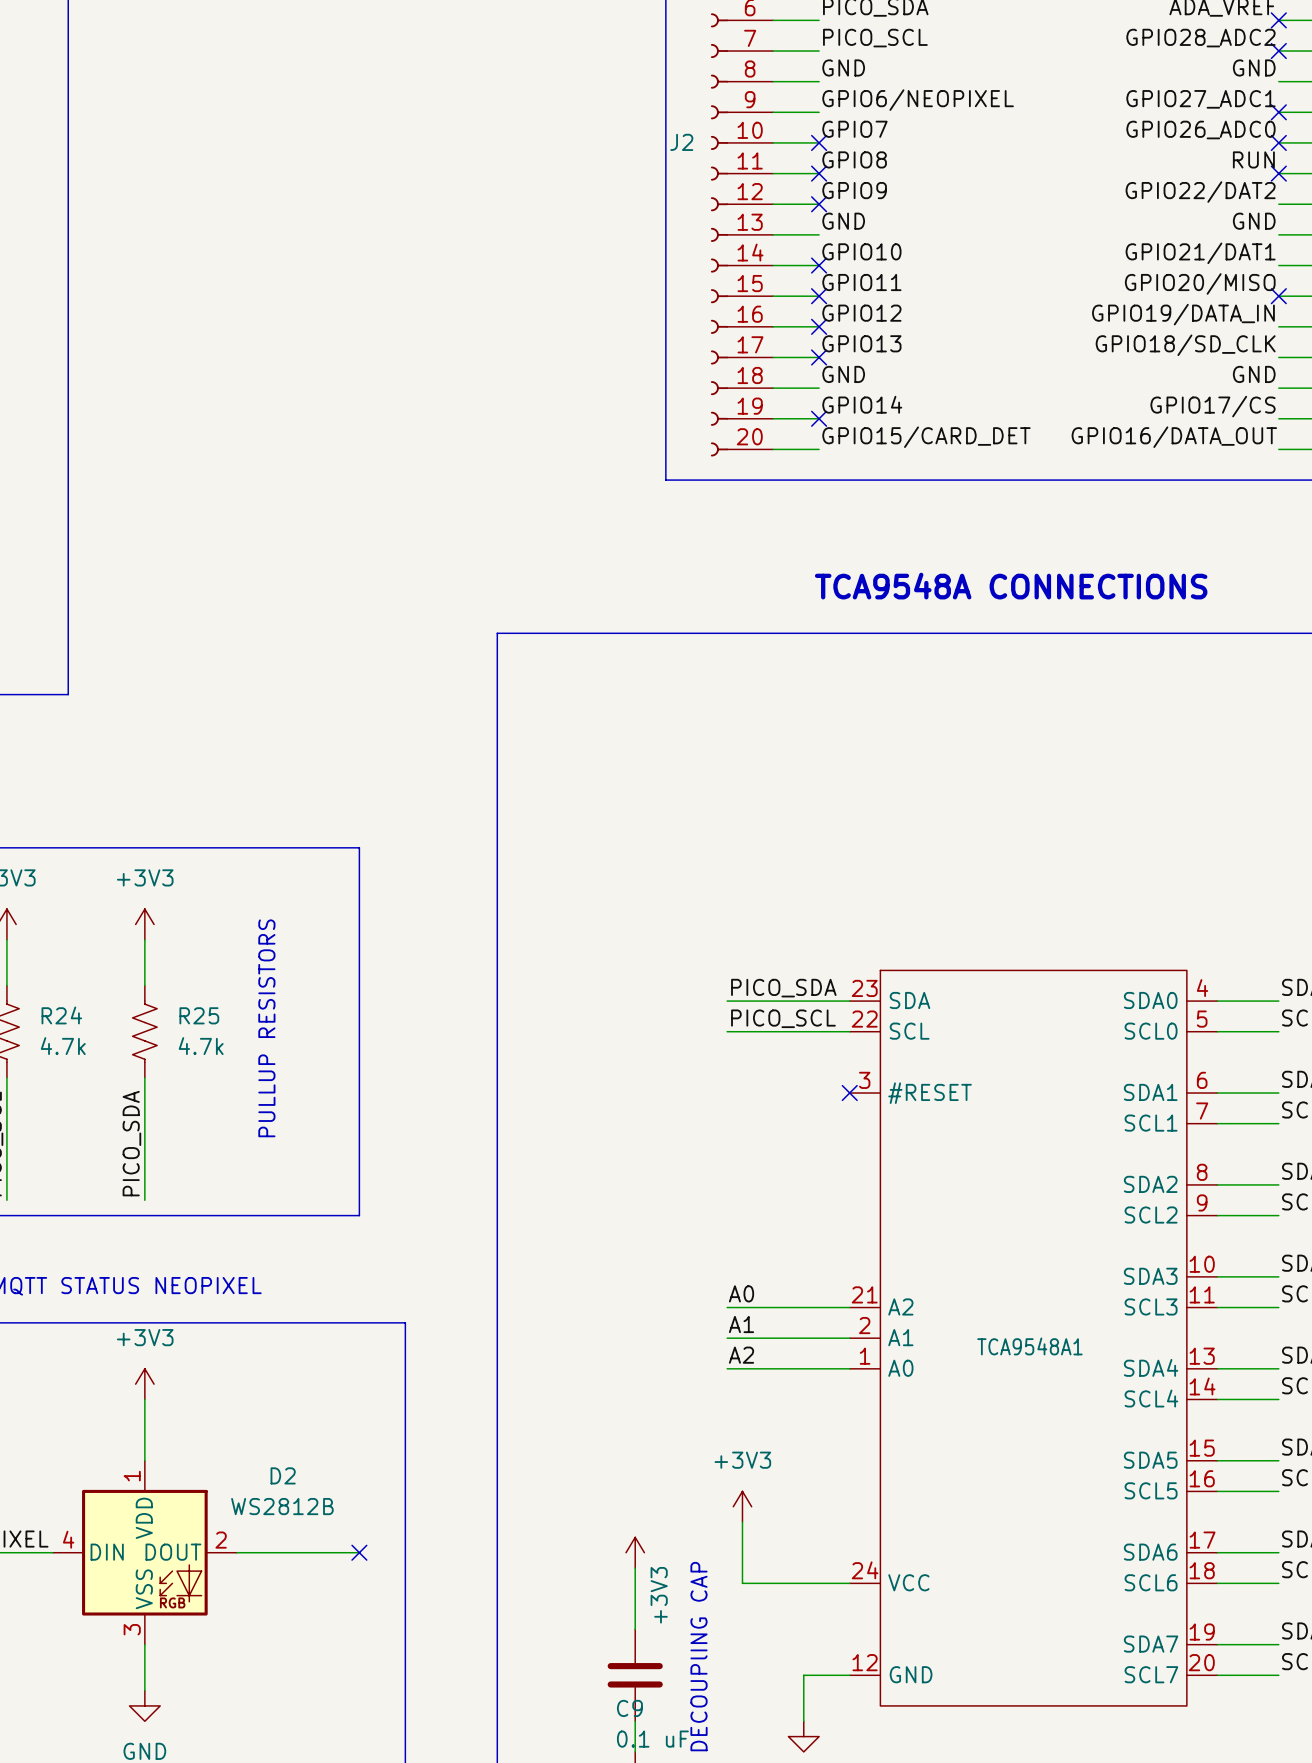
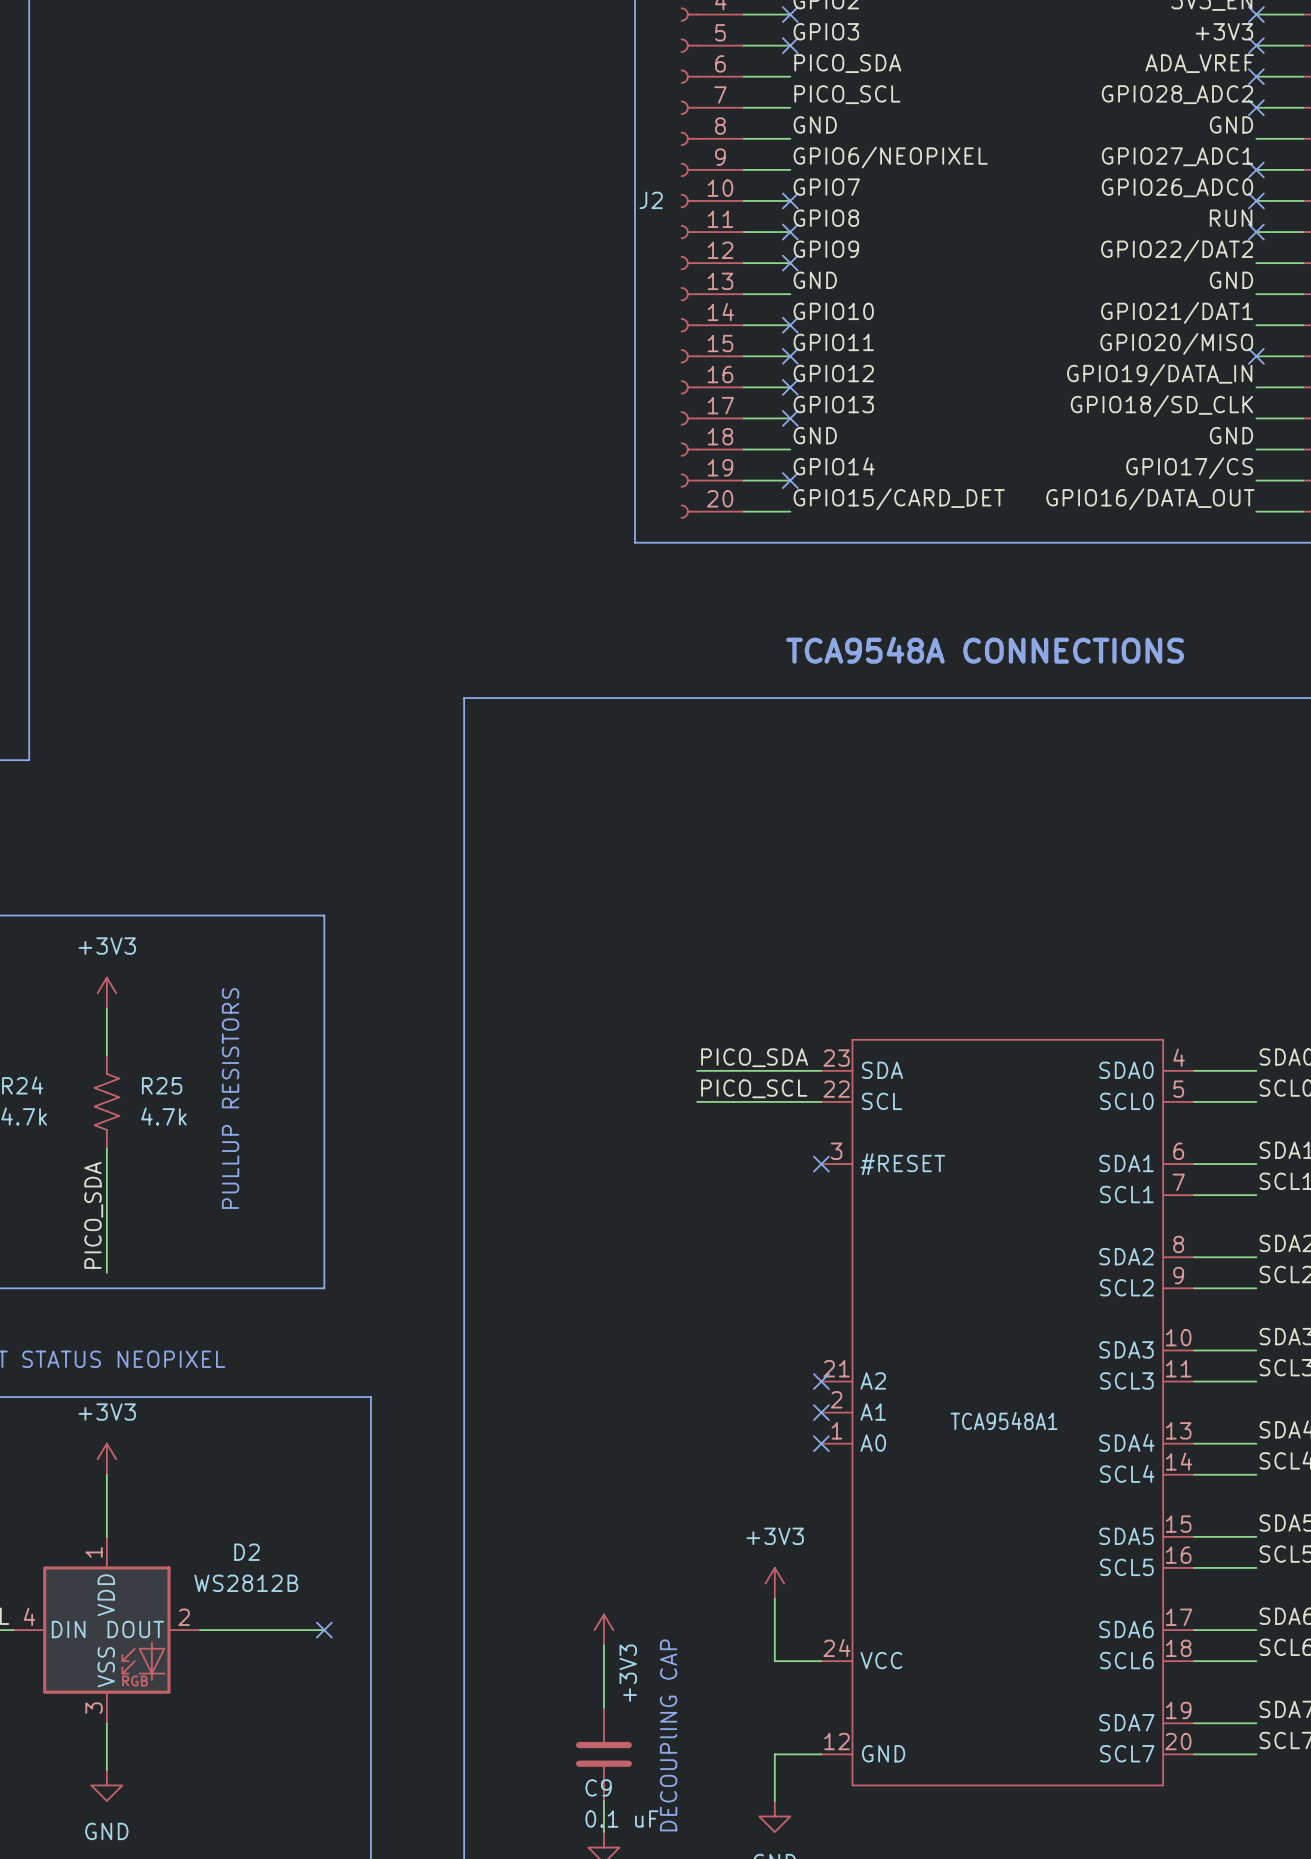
label: A0 (741, 1293) -> none
wire: (727, 1307) (849, 1307) -> none
no-connect mark: none -> (821, 1381)
label: A1 (741, 1324) -> none
wire: (727, 1338) (849, 1338) -> none
no-connect mark: none -> (821, 1412)
label: A2 (741, 1355) -> none
wire: (727, 1368) (849, 1368) -> none
no-connect mark: none -> (821, 1443)
power symbol position: +3V3 (742, 1506) -> +3V3 (774, 1583)
wire: (742, 1522) (742, 1583) (803, 1583) -> (774, 1599) (774, 1661)

